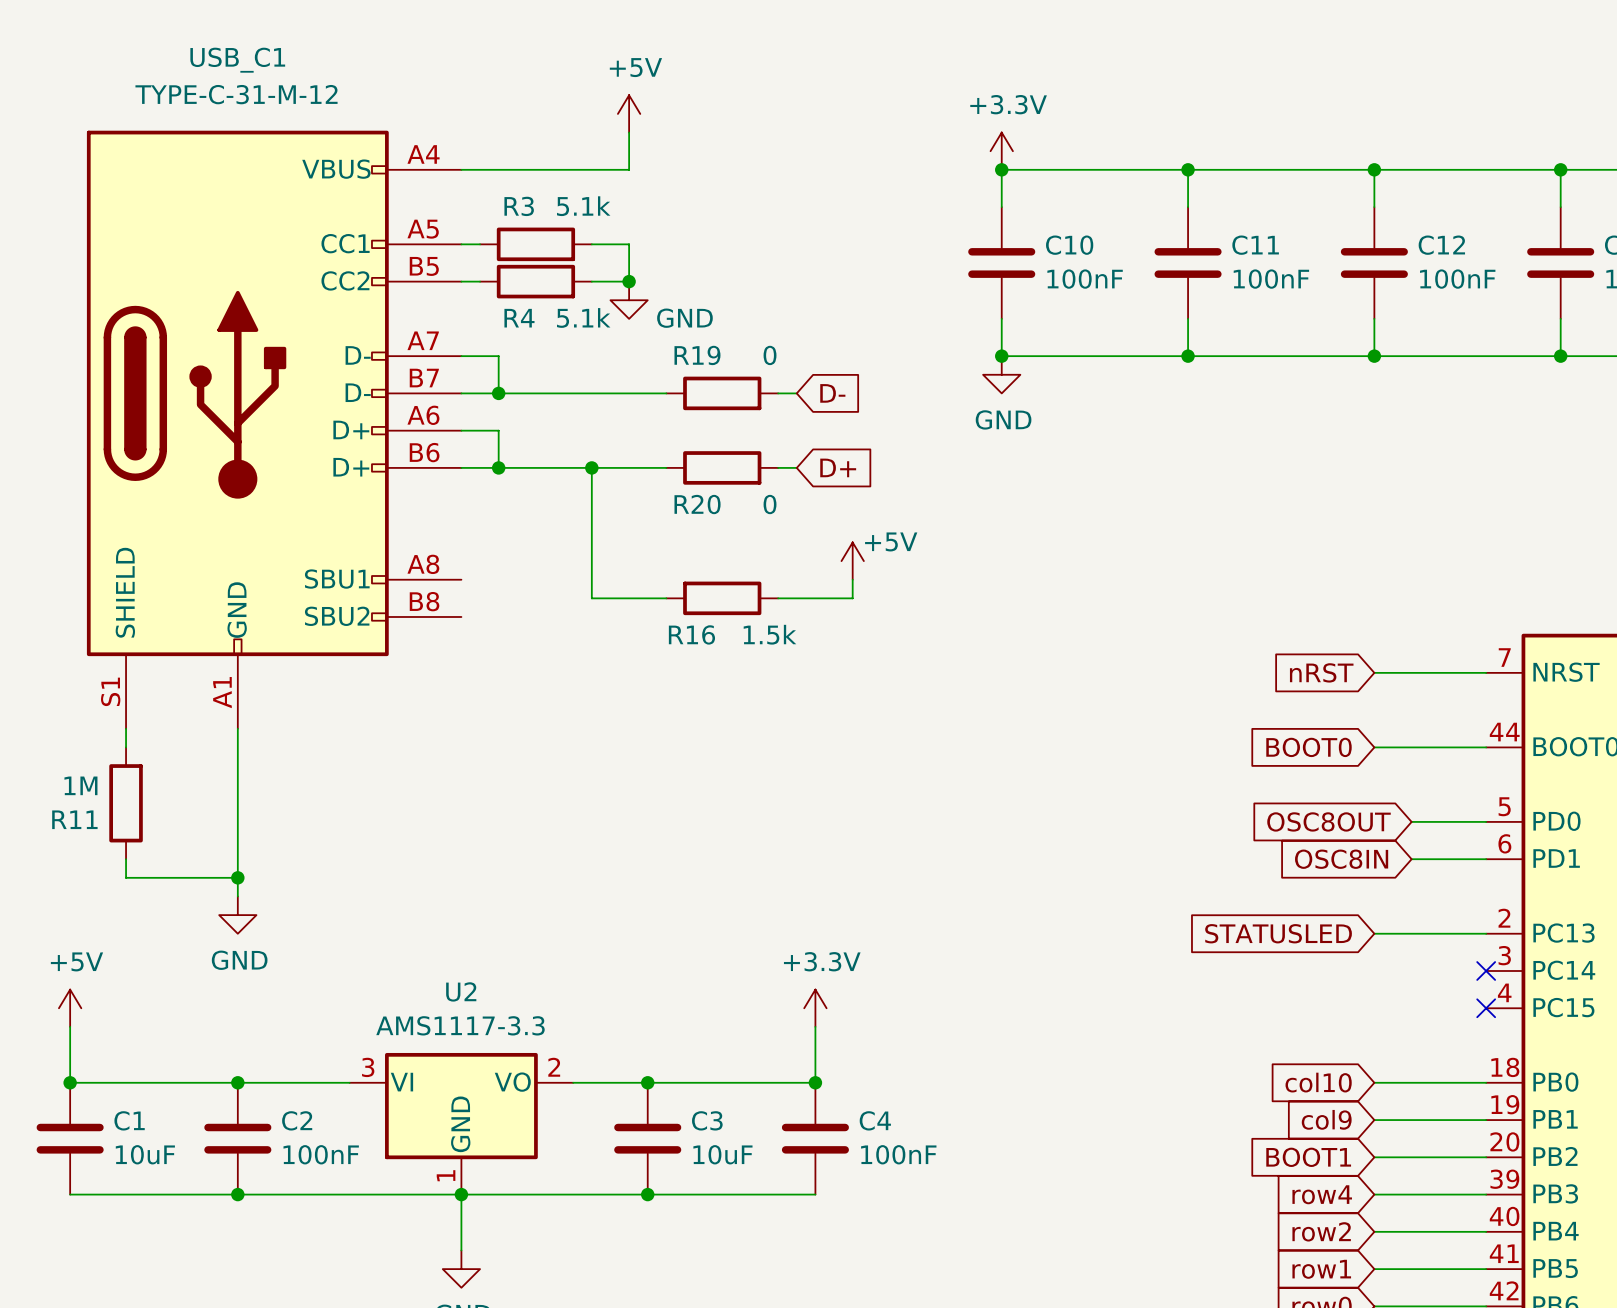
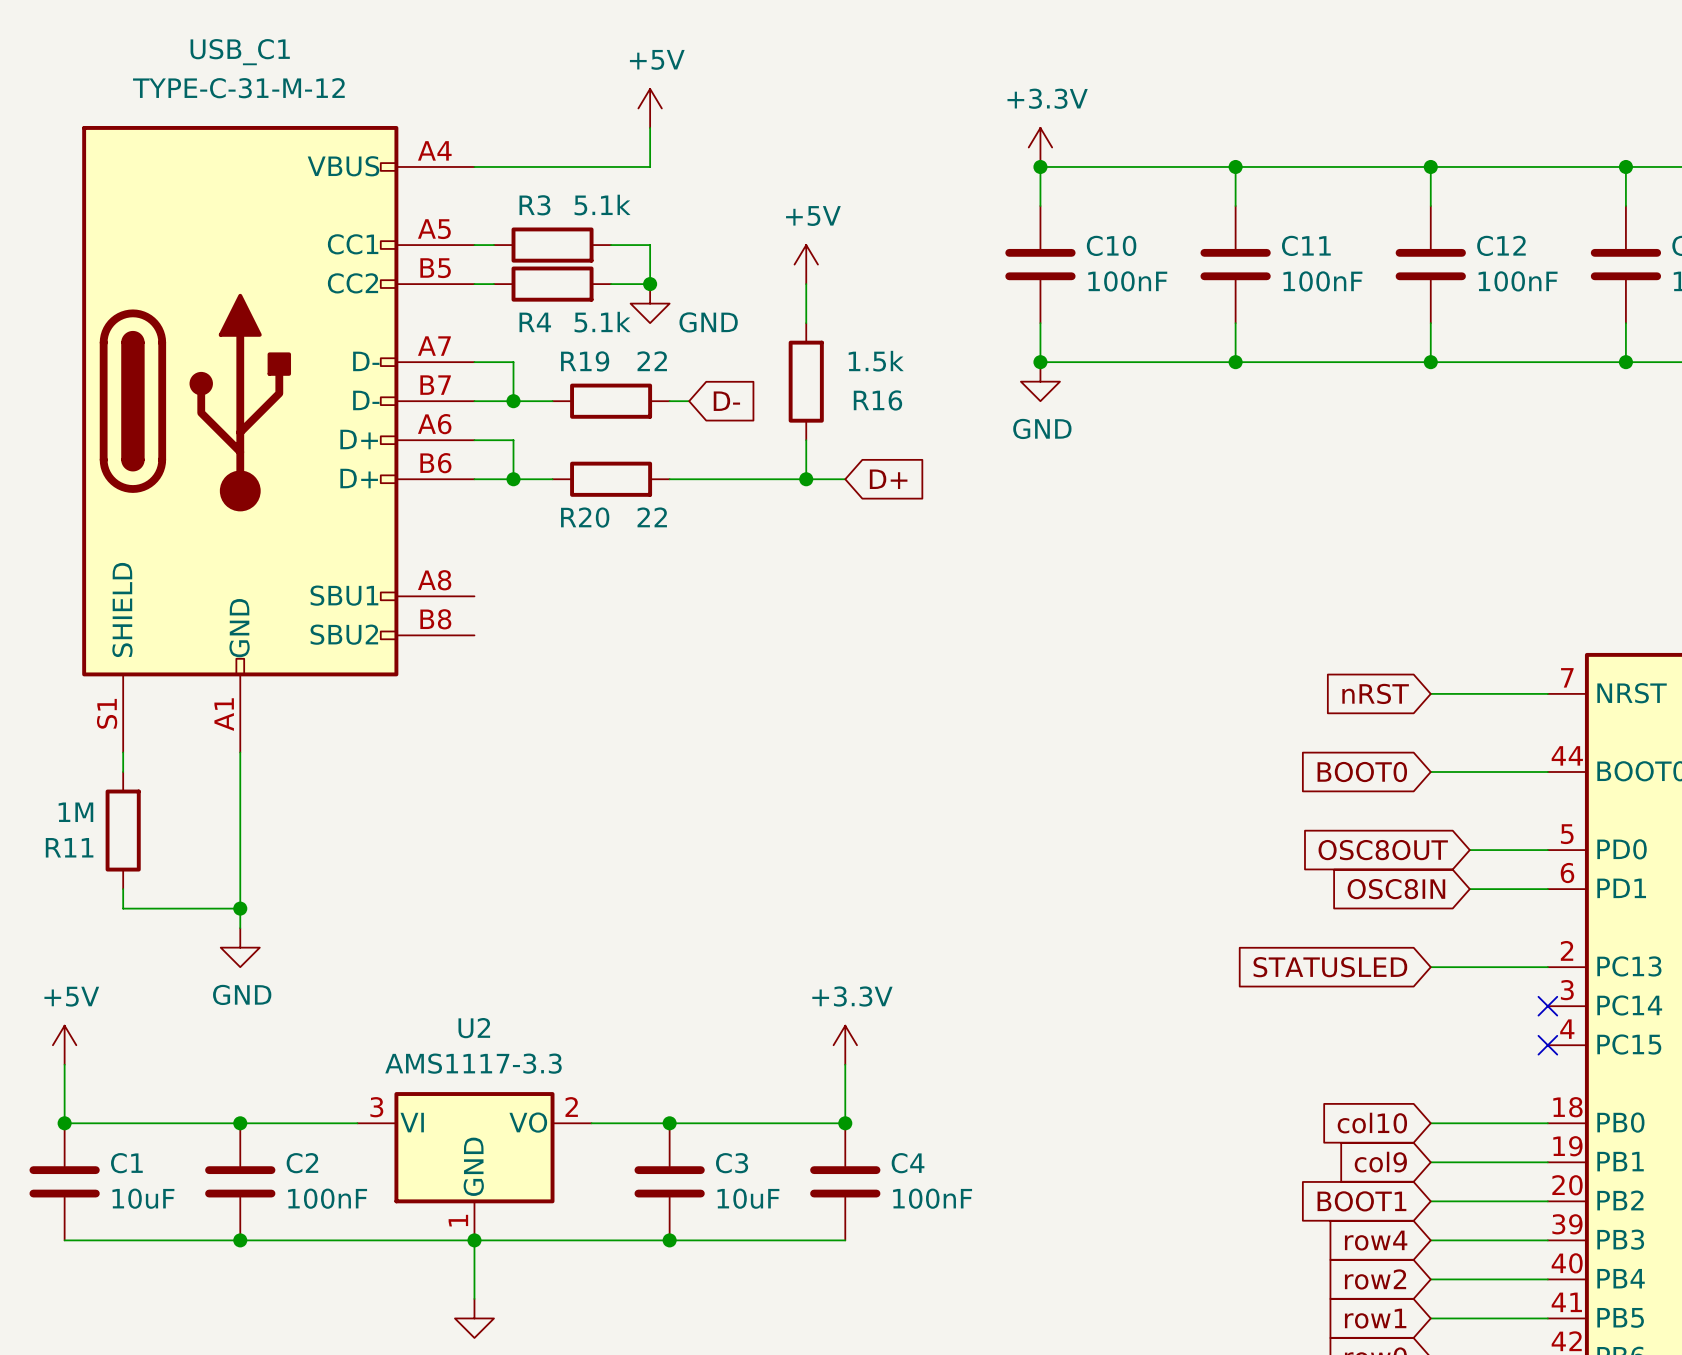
wire: none -> (806, 284) (806, 323)
R19 value: 0 (770, 355) -> 22 (652, 361)
wire: (535, 393) (647, 393) -> none
R19 position: (722, 393) -> (611, 401)
wire: (778, 393) (796, 393) -> (825, 479) (845, 479)
global label position: D- (832, 393) -> D- (726, 401)
wire: none -> (806, 440) (806, 479) (689, 479)
wire: (535, 467) (647, 467) -> none
wire: (591, 467) (591, 598) (666, 598) -> none
junction: (591, 467) -> none
R20 position: (722, 467) -> (611, 479)
junction: none -> (806, 479)
global label position: D+ (838, 467) -> D+ (888, 479)
R20 value: 0 (770, 504) -> 22 (652, 517)
power symbol text position: +5V (891, 541) -> +5V (813, 216)
power symbol position: +5V (852, 561) -> +5V (806, 264)
wire: (852, 579) (852, 598) (778, 598) -> none
R16 rotation: 0° (722, 598) -> 90° clockwise (806, 381)
R16 position: (722, 598) -> (806, 381)
R16 name position: R16 (691, 634) -> R16 (877, 400)
R16 value position: 1.5k (769, 634) -> 1.5k (876, 361)

